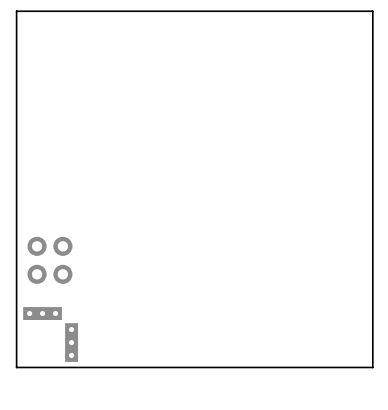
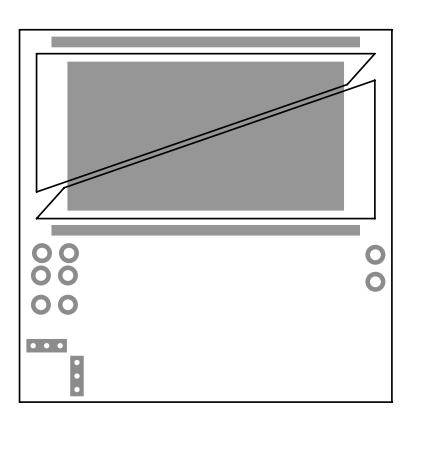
part: none -> (205, 136)
part: none -> (55, 253)
part: none -> (375, 268)

